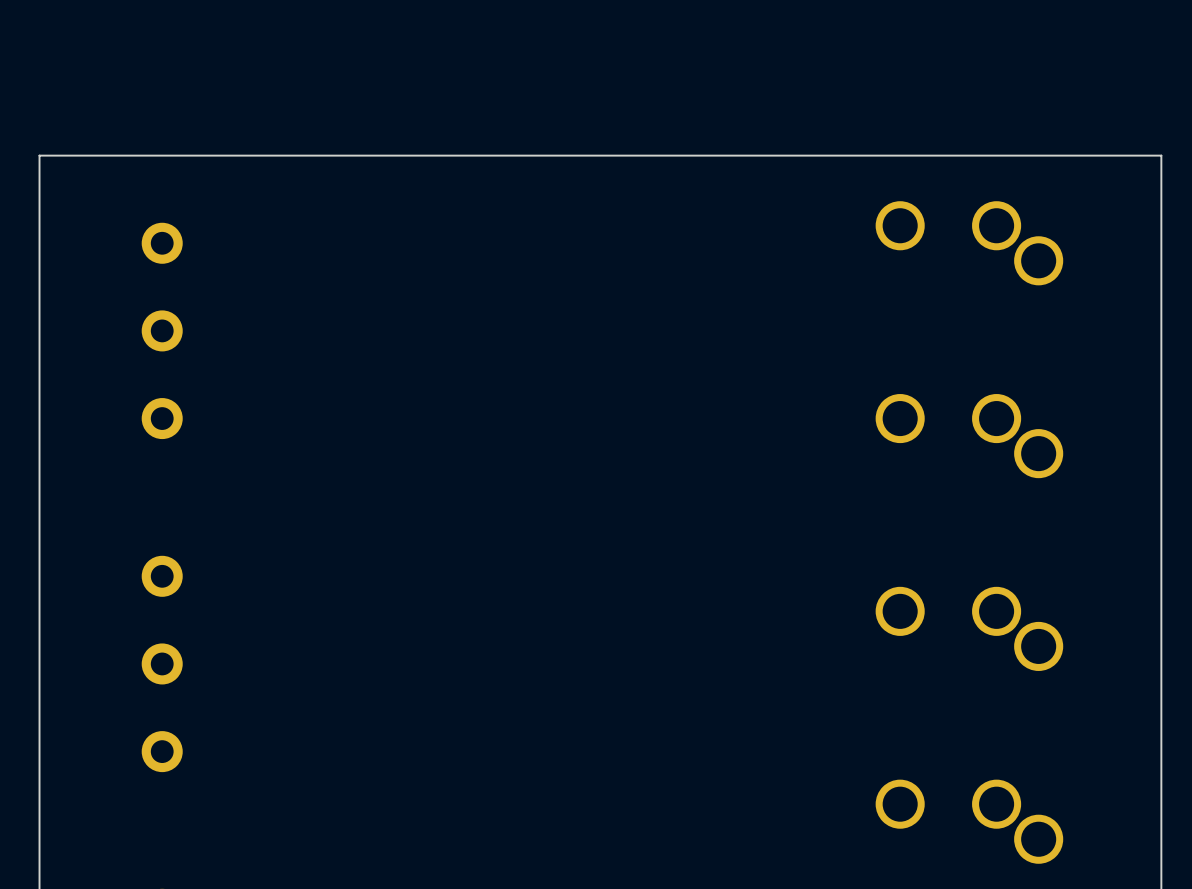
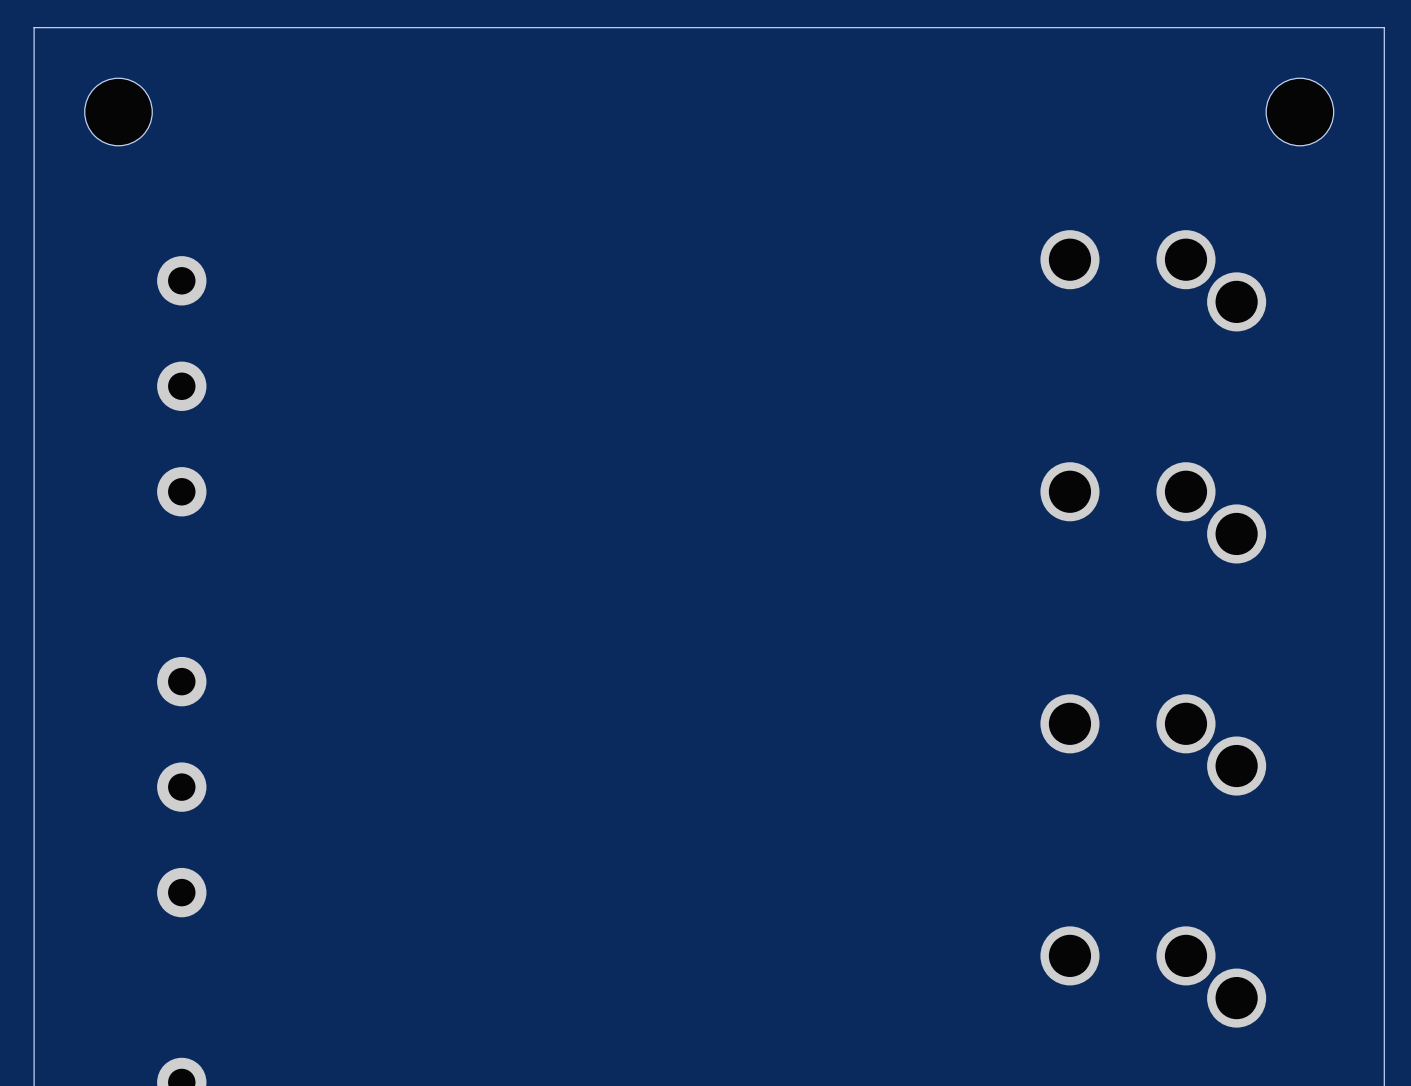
part: none -> (118, 112)
part: none -> (1299, 112)
board edge: (1161, 155) (39, 155) -> (1384, 175) (1384, 27) (34, 27) (34, 175)

